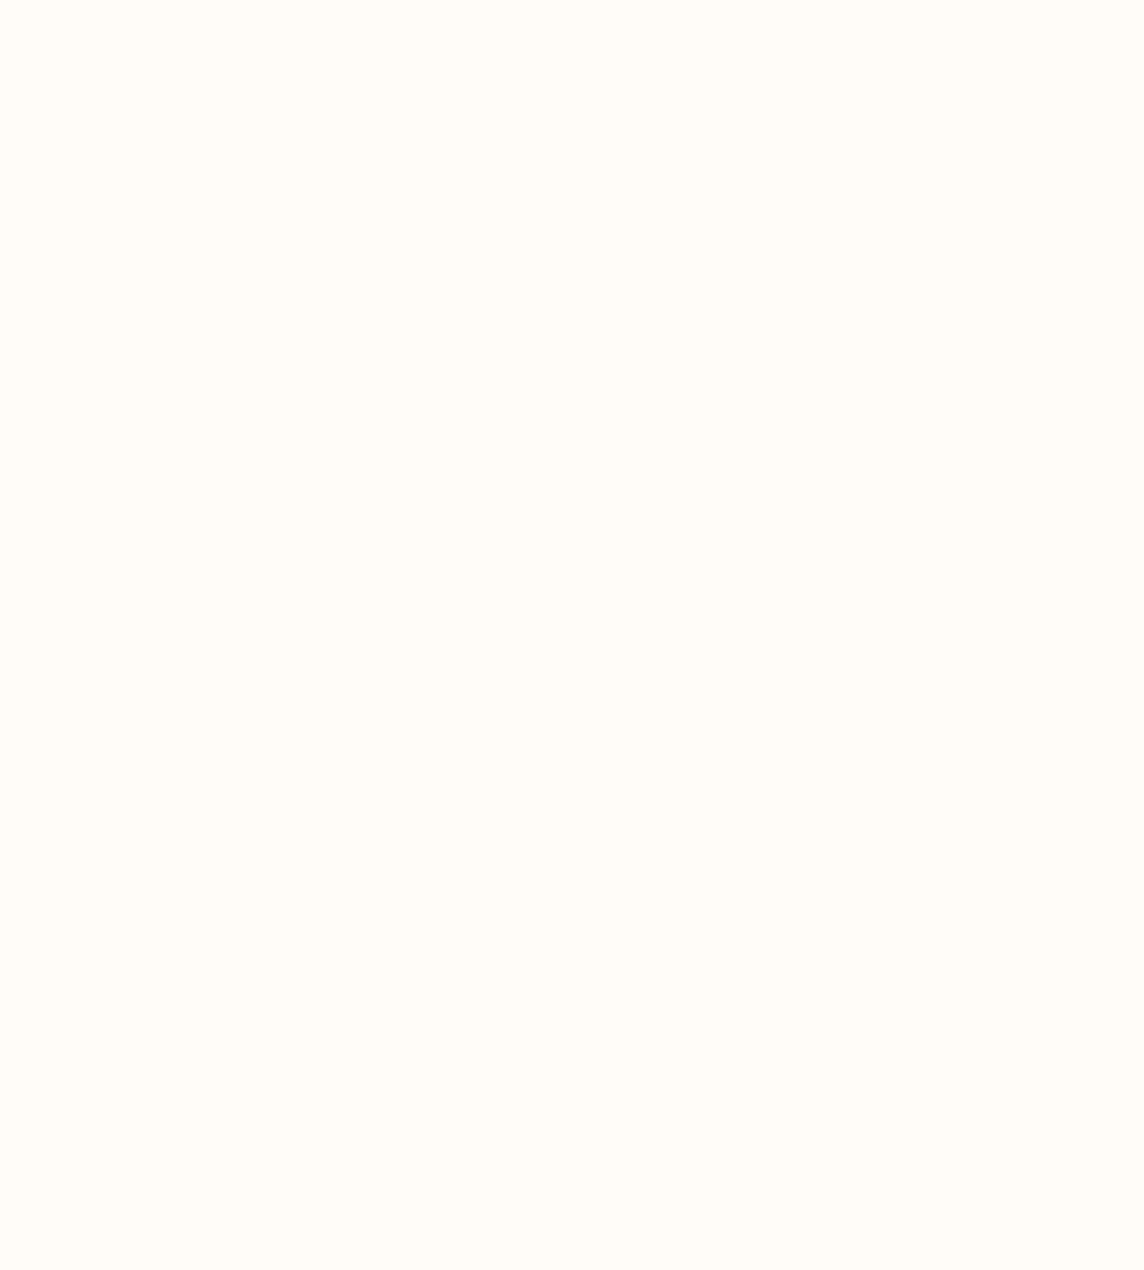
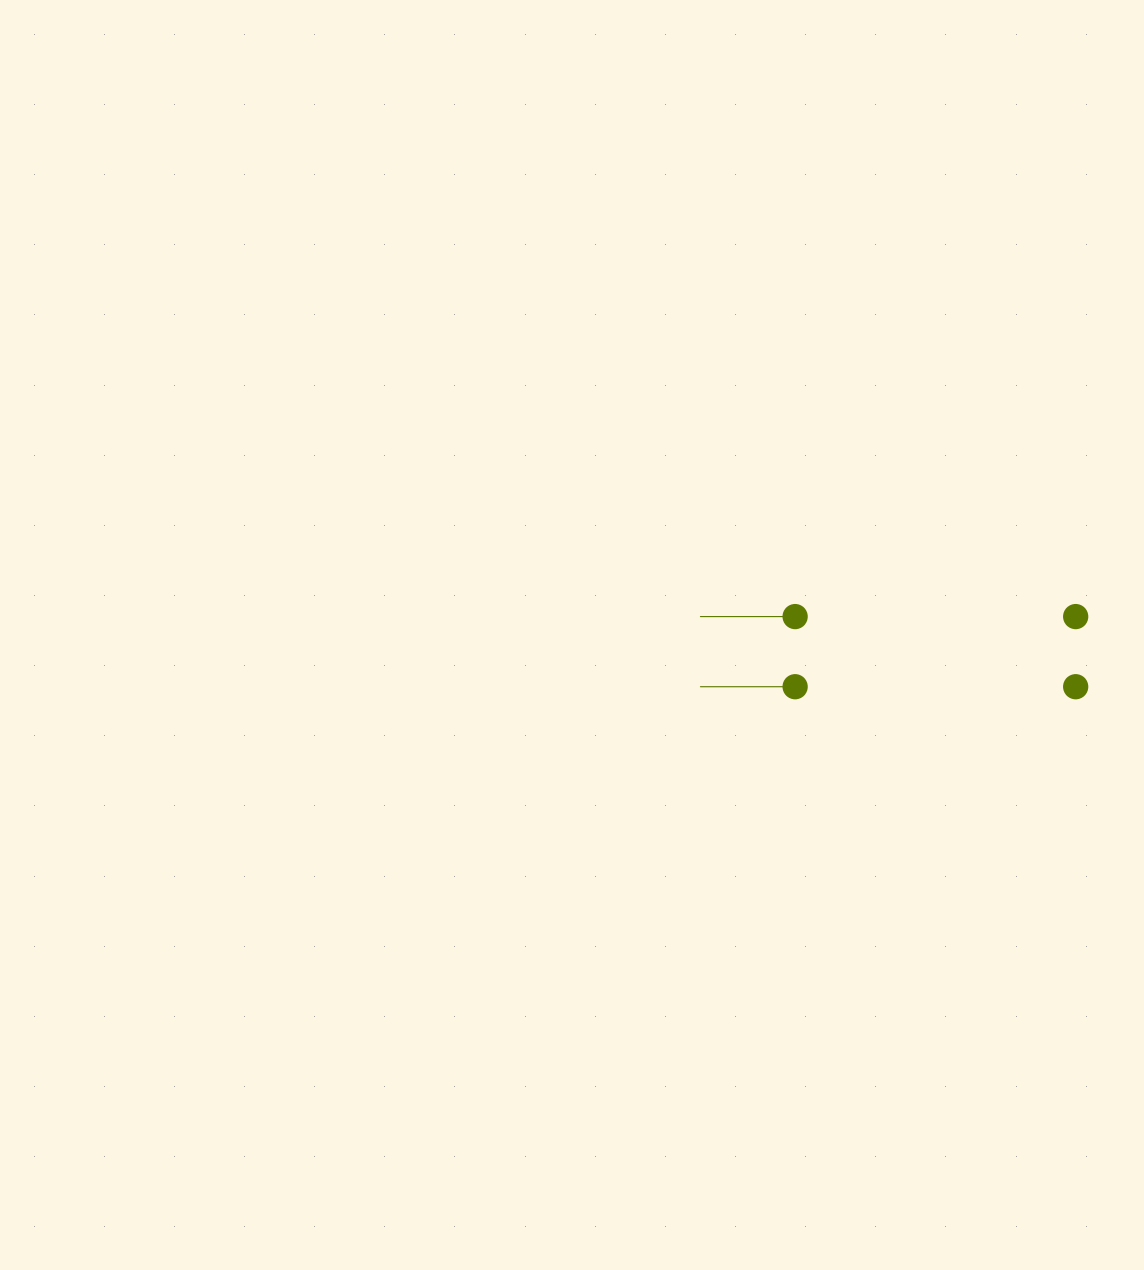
wire: none -> (700, 616) (798, 616)
junction: none -> (795, 616)
junction: none -> (1075, 616)
wire: none -> (700, 686) (798, 686)
junction: none -> (795, 686)
junction: none -> (1075, 686)

